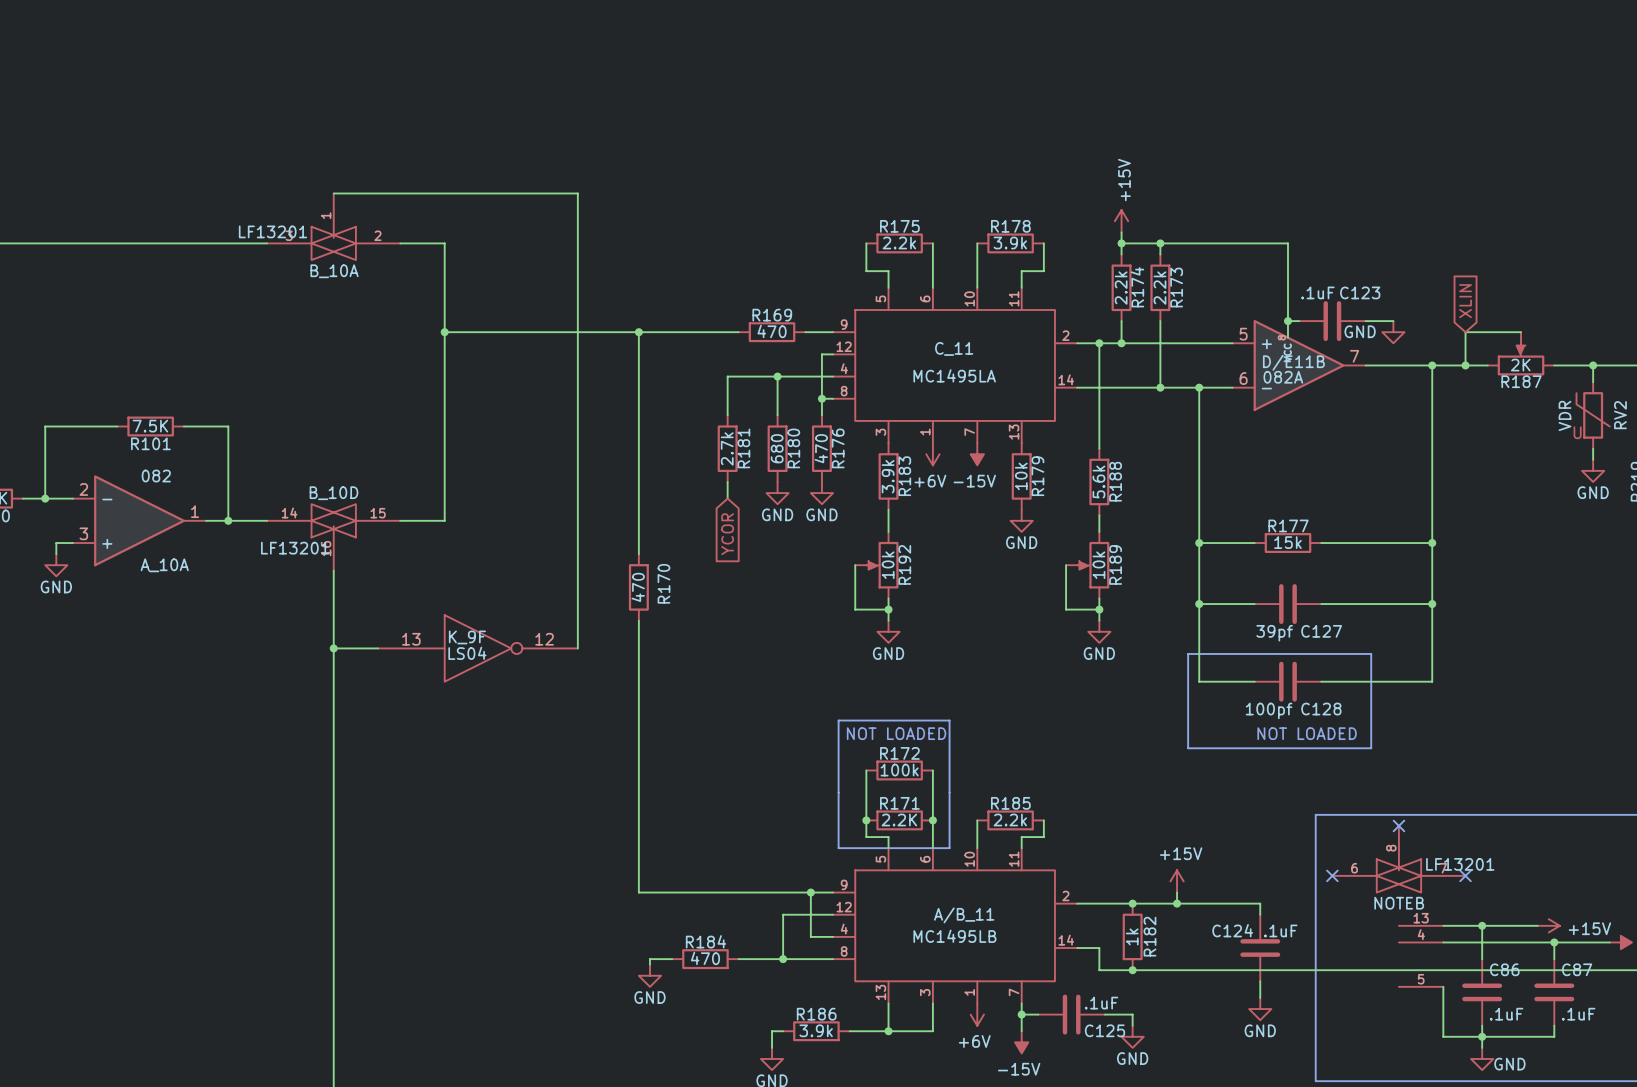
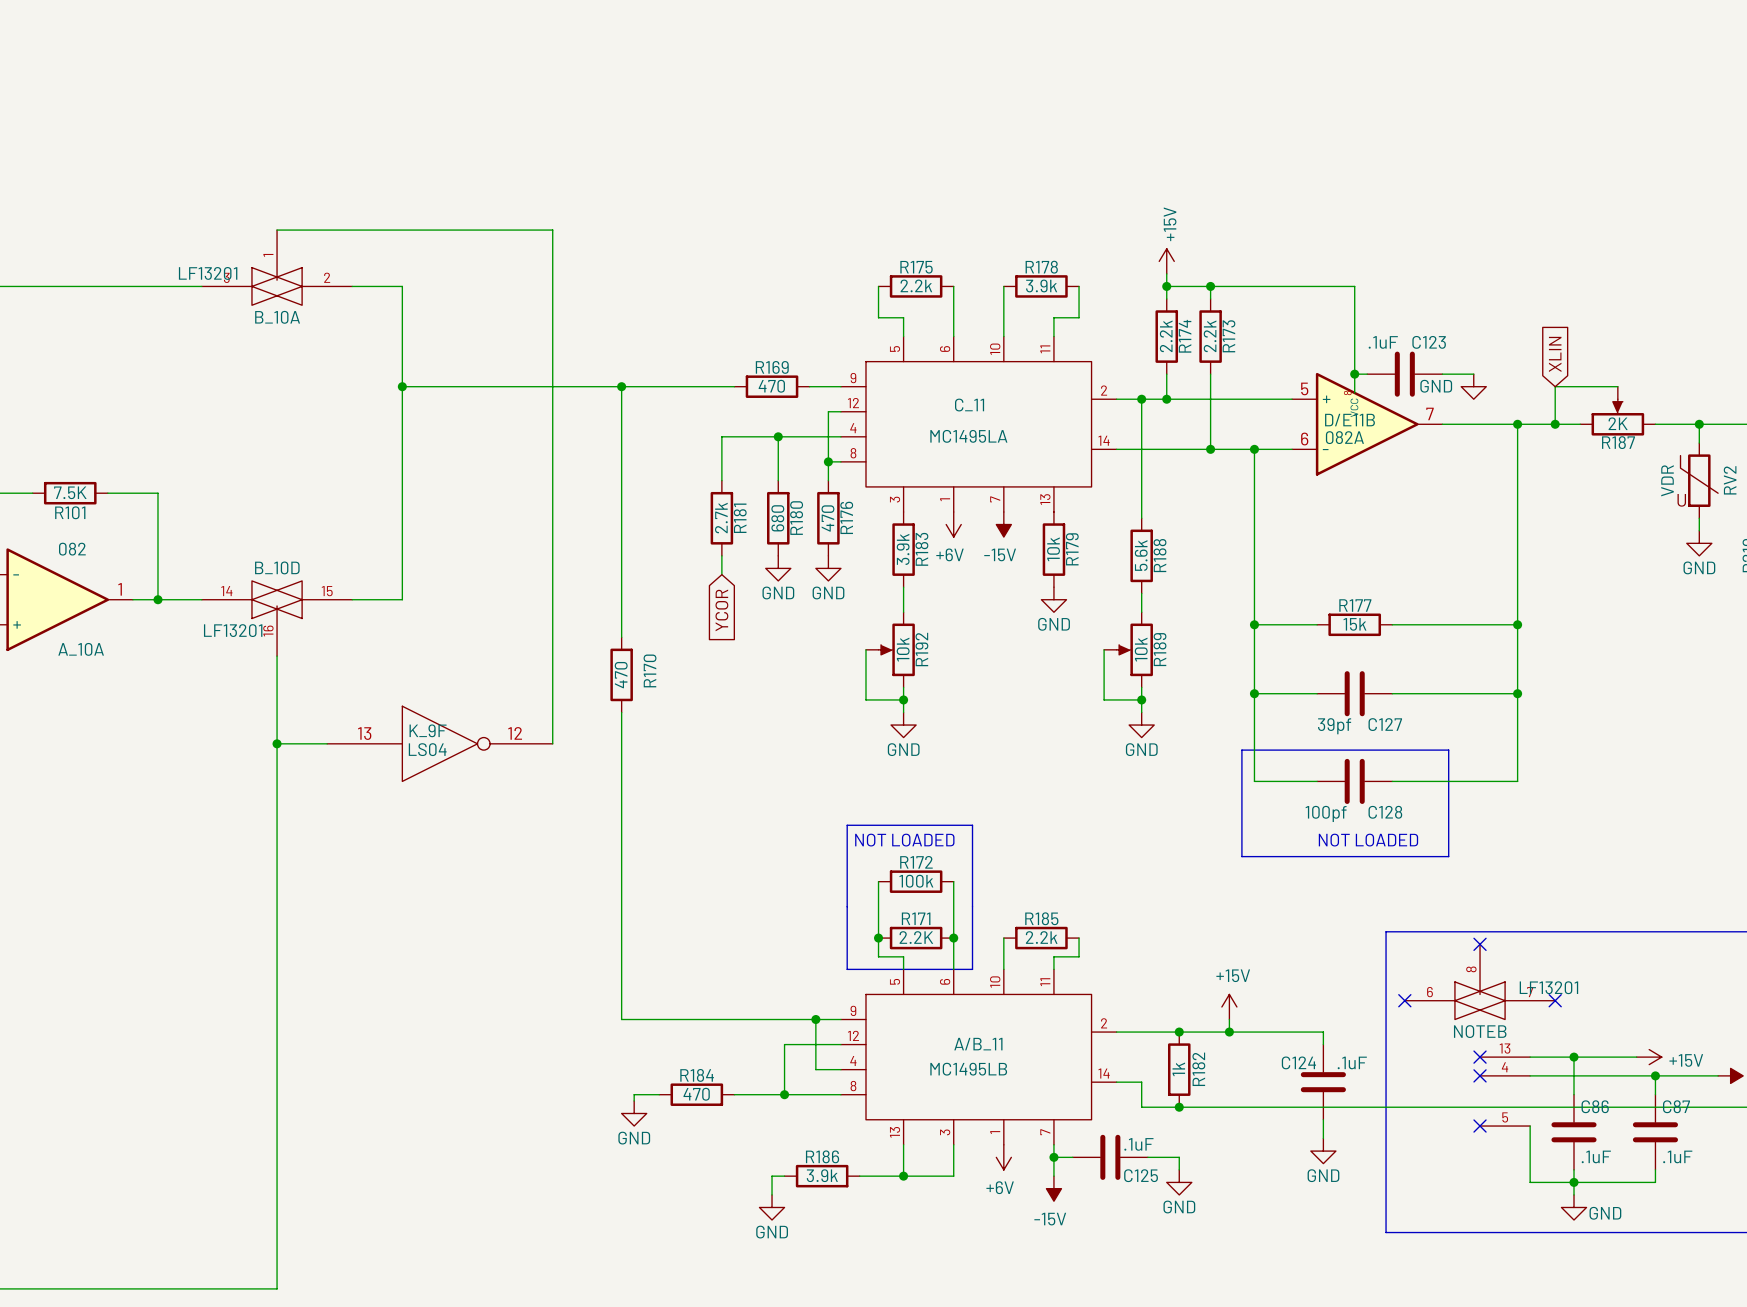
no-connect mark: none -> (1480, 1057)
no-connect mark: none -> (1480, 1075)
no-connect mark: none -> (1480, 1126)

